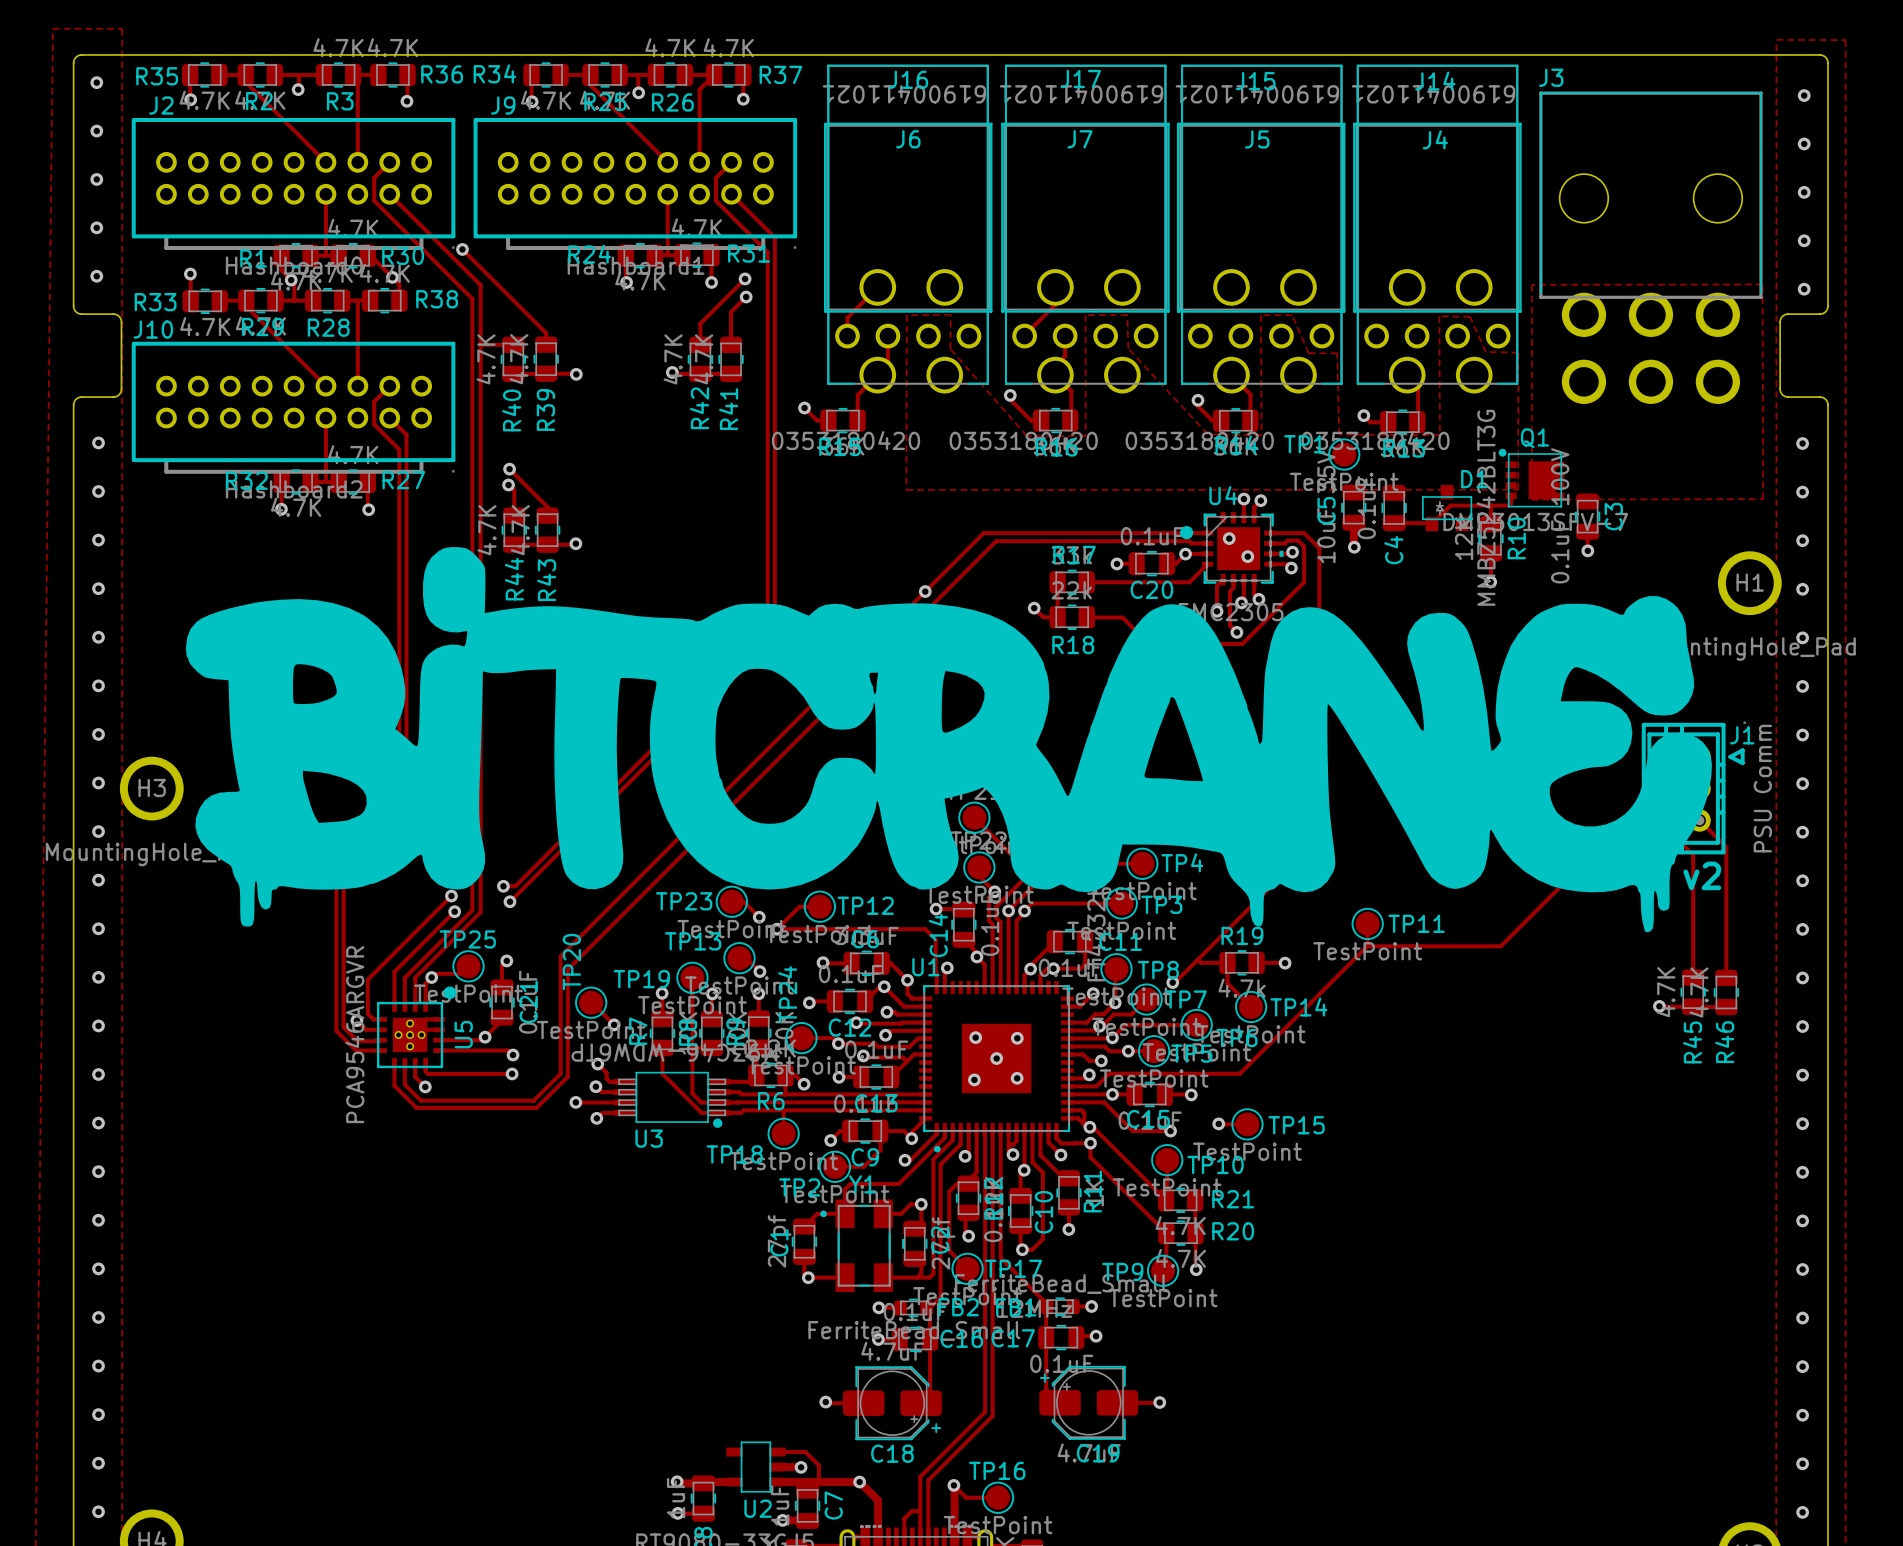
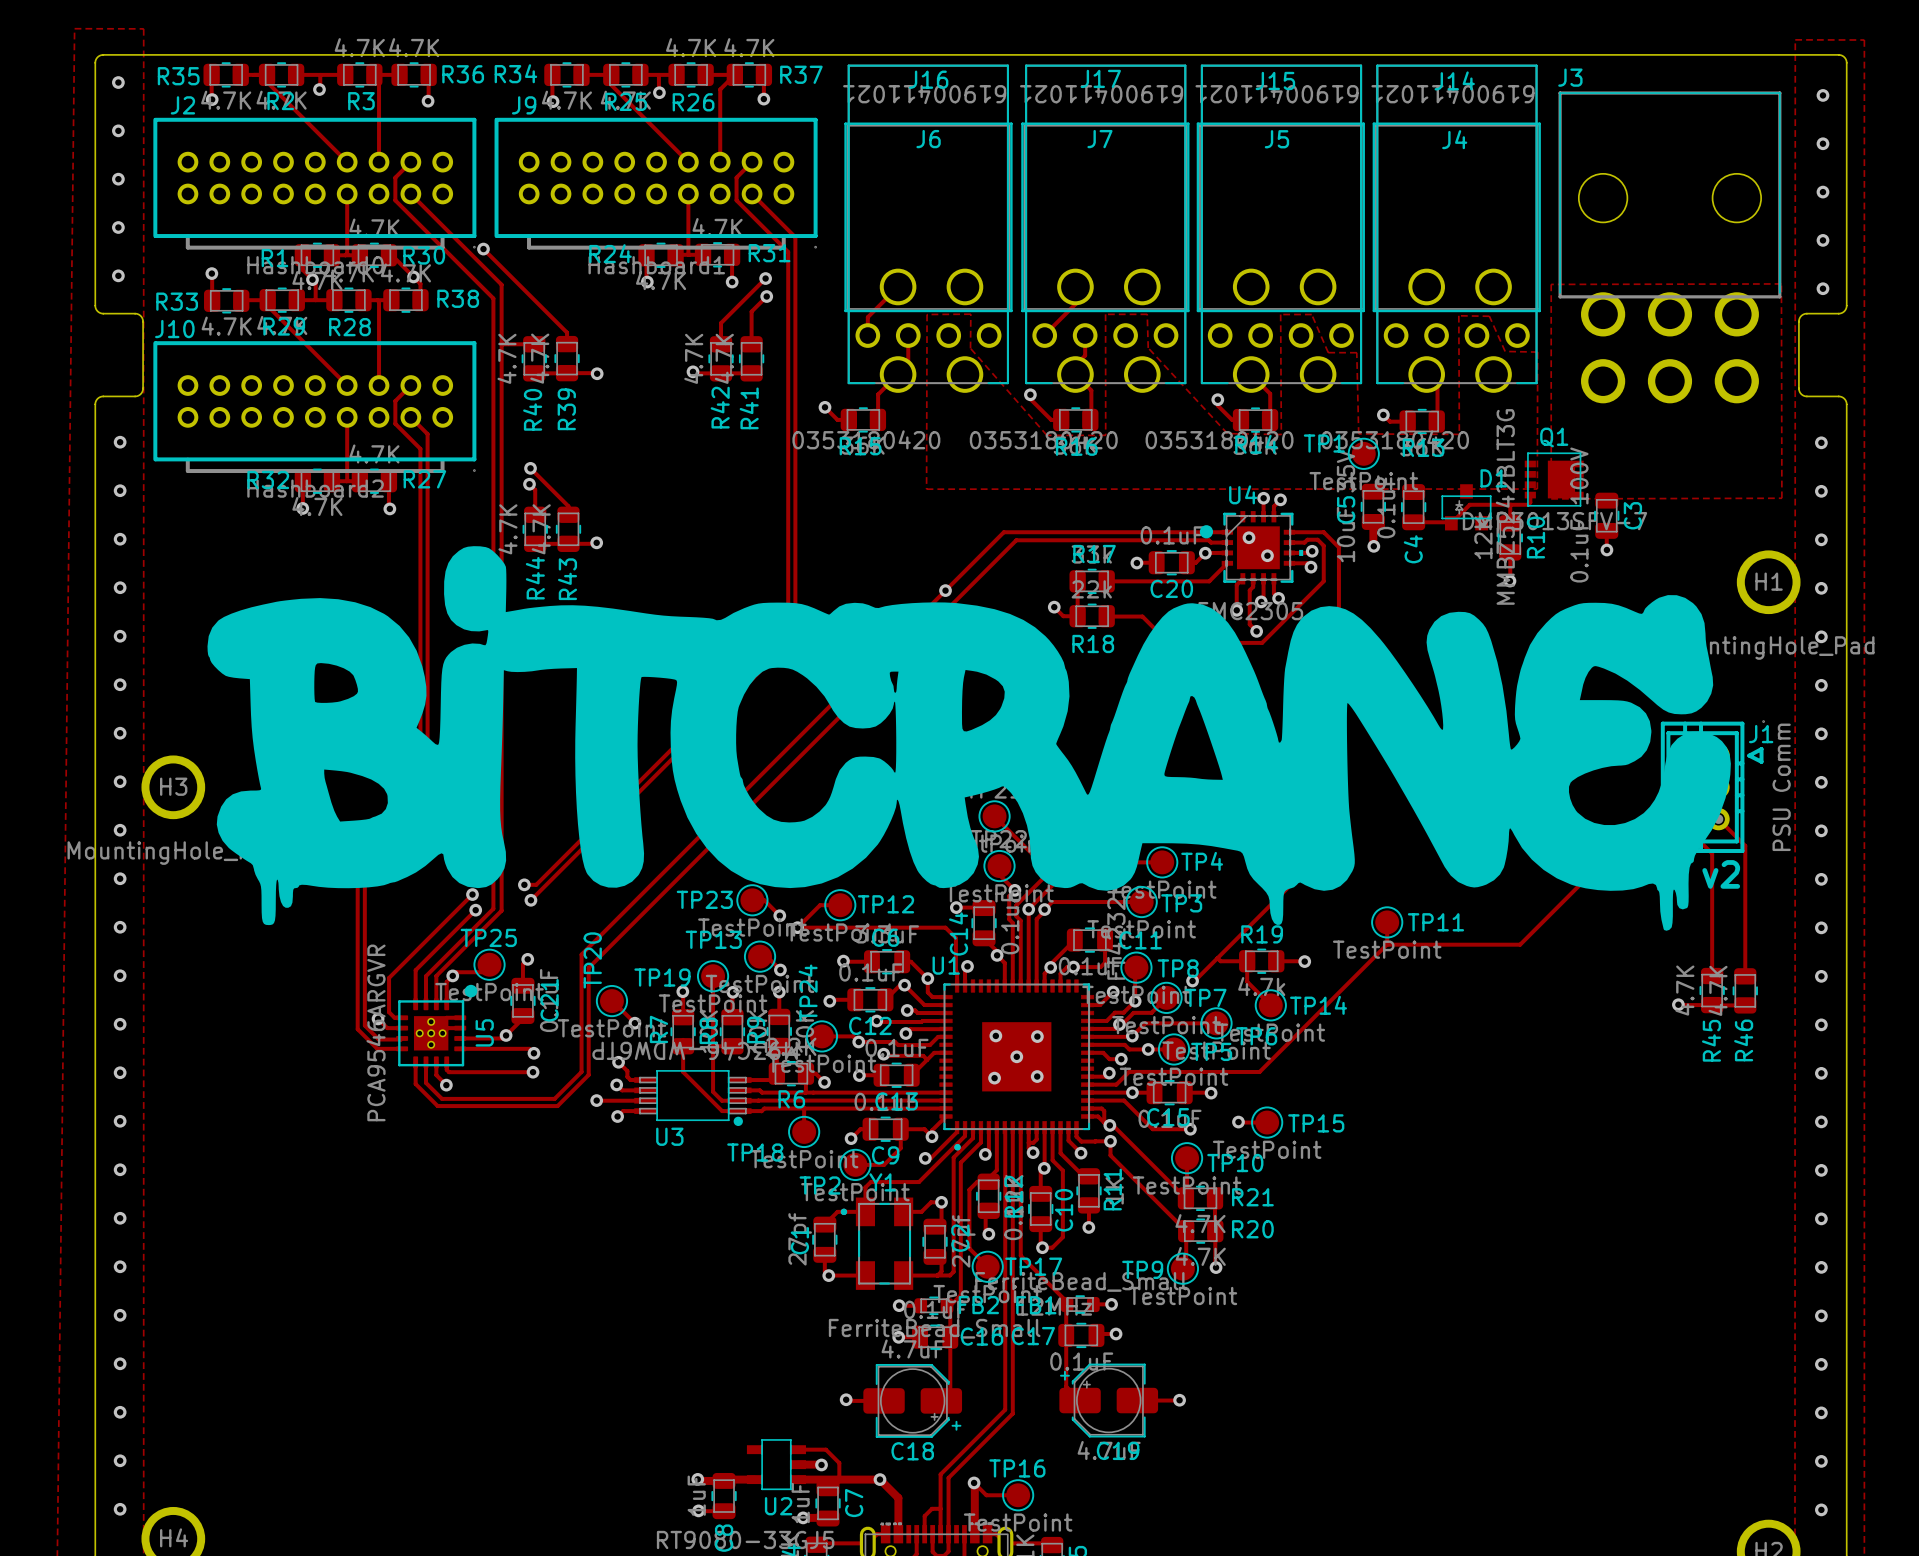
Q1 footprint: [1498, 448, 1565, 508] -> [1524, 452, 1584, 507]

